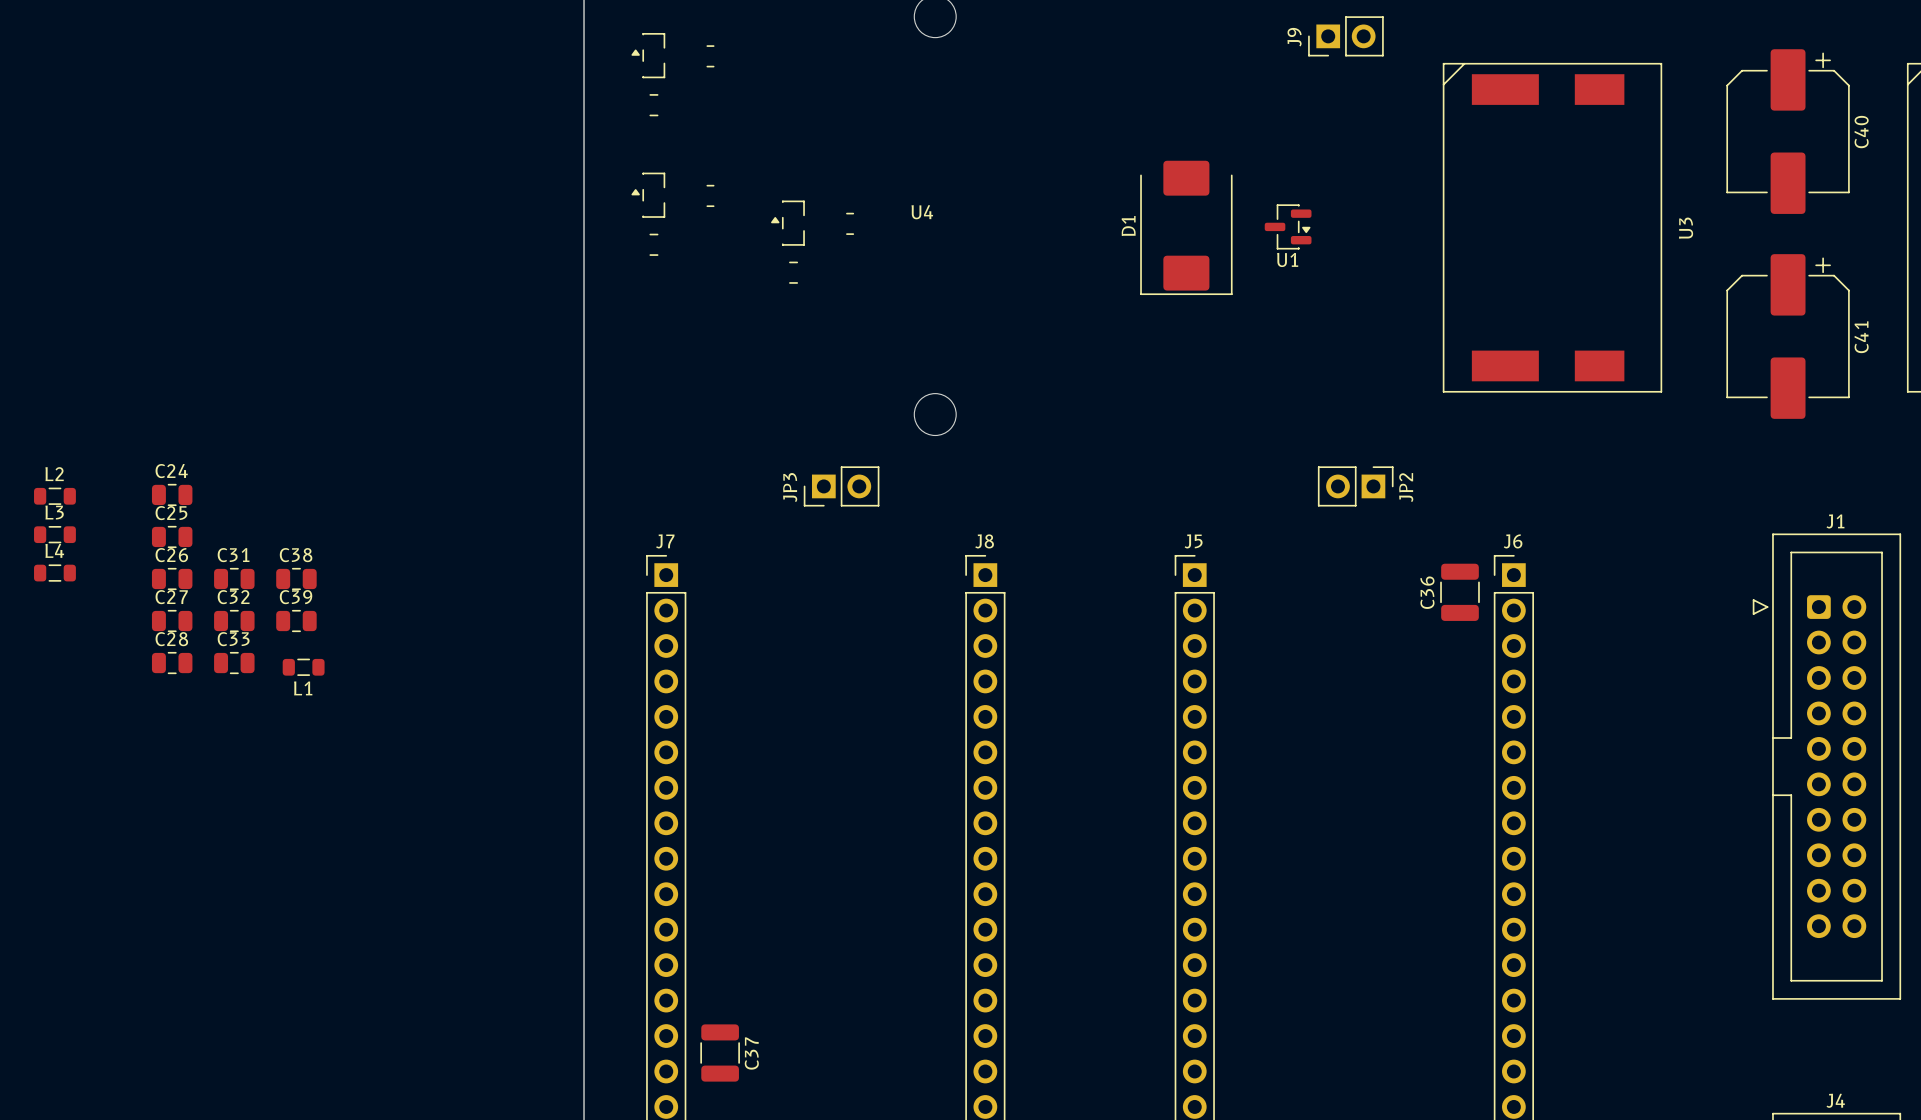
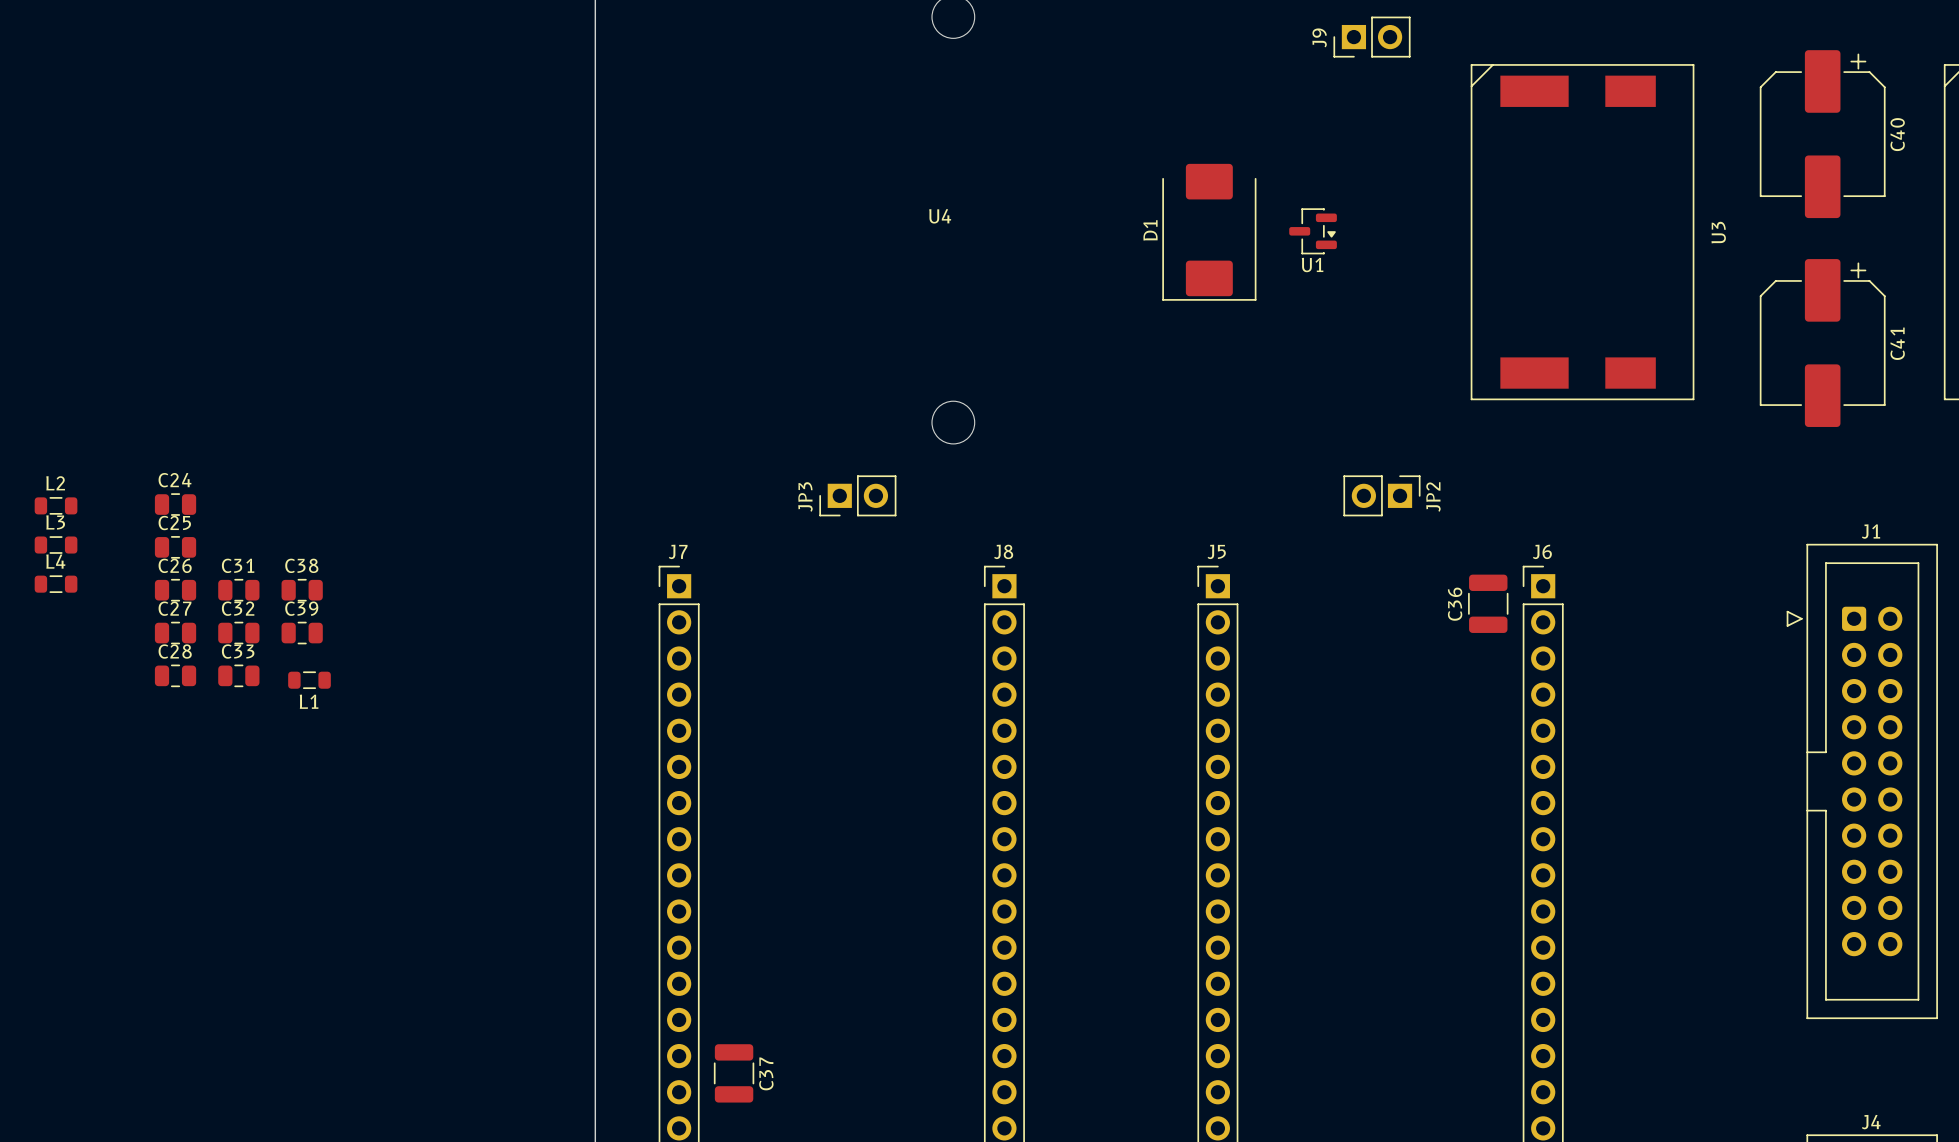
part: (648, 55) -> none
part: (710, 56) -> none
part: (653, 105) -> none
part: (648, 195) -> none
part: (710, 195) -> none
part: (787, 223) -> none
part: (850, 223) -> none
part: (653, 244) -> none
part: (793, 272) -> none

